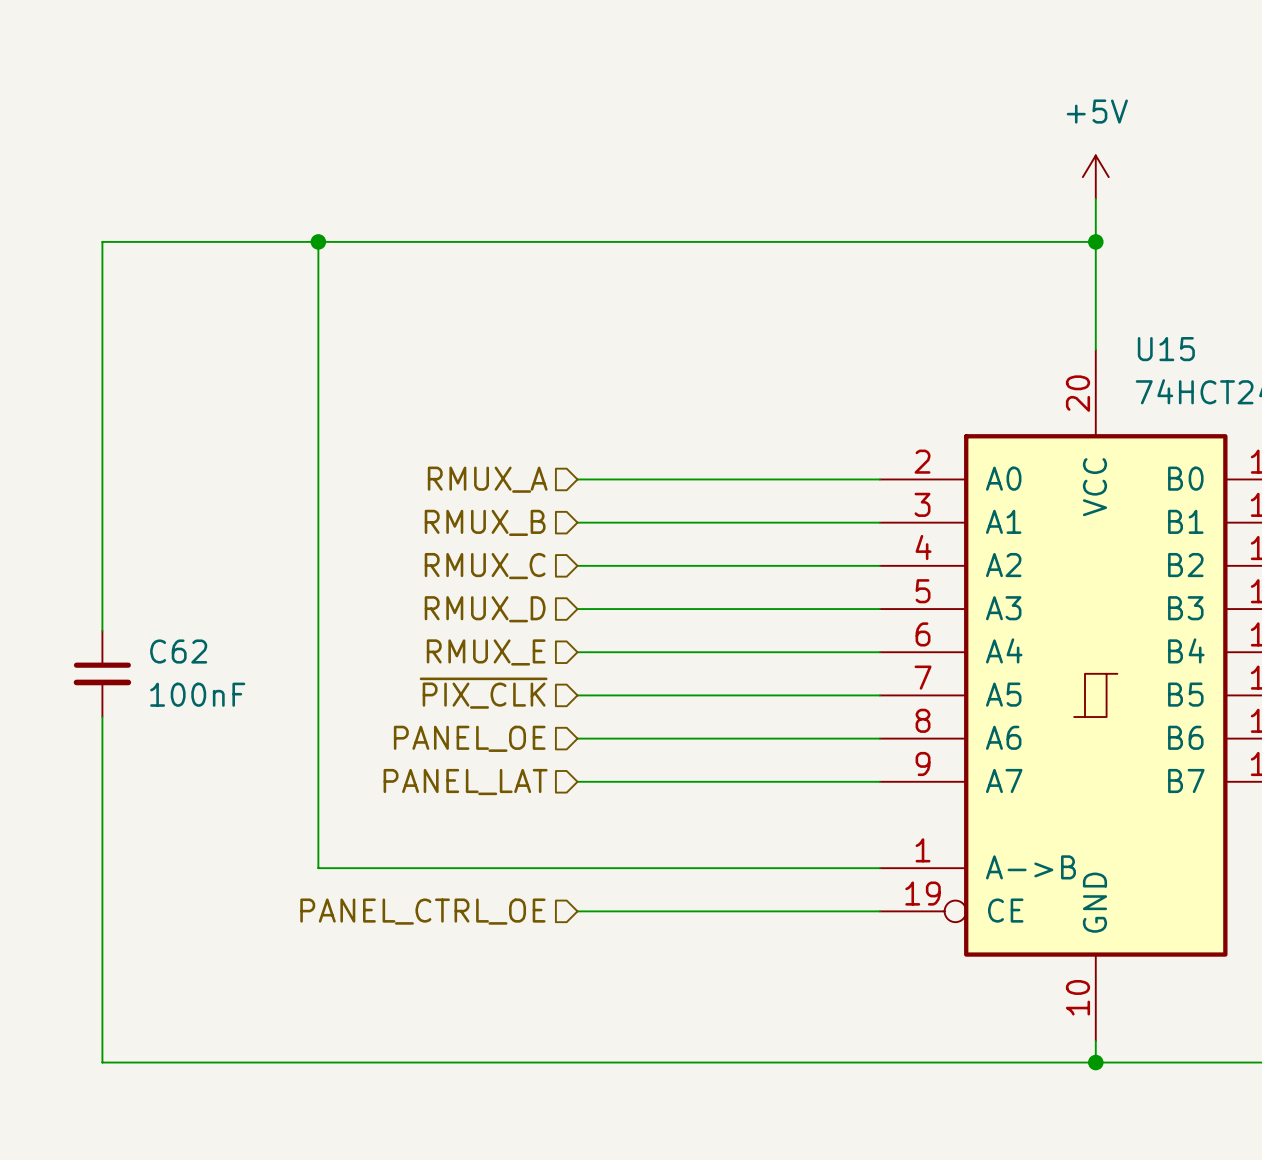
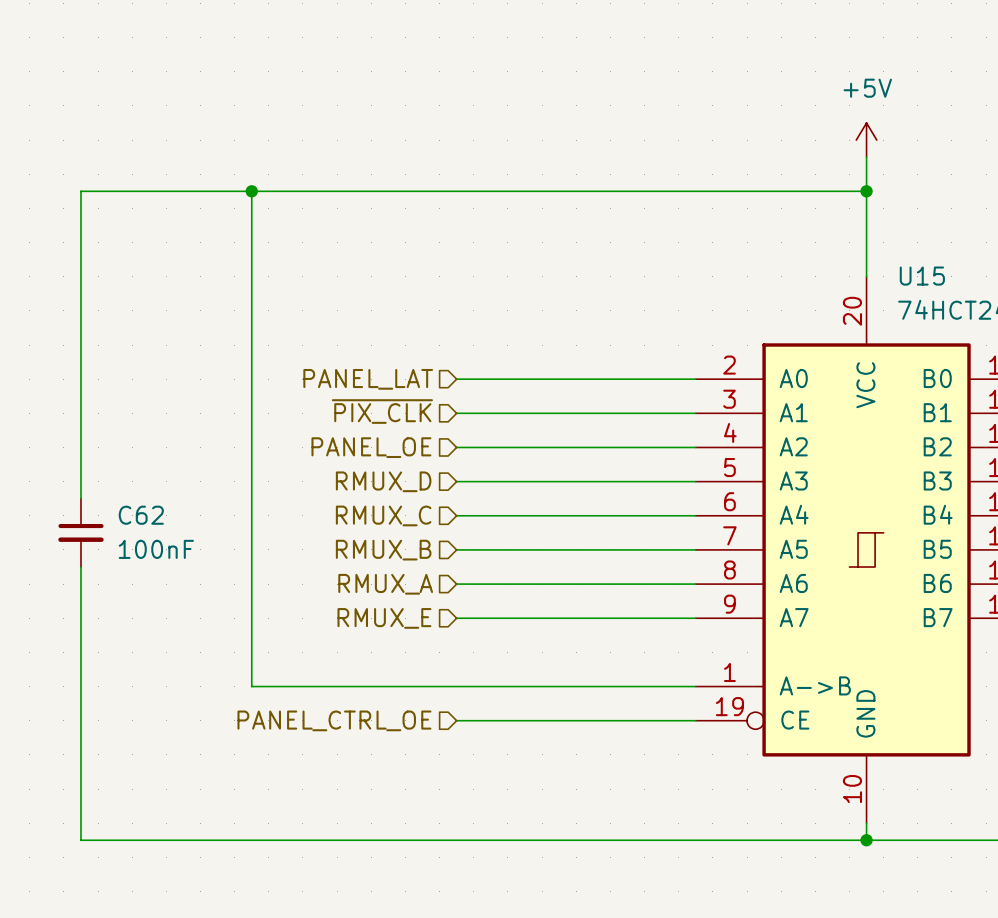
hierarchical label: RMUX_A (487, 479) -> PANEL_LAT (368, 379)
hierarchical label: RMUX_B (485, 522) -> ~{PIX_CLK} (382, 411)
hierarchical label: RMUX_C (485, 566) -> PANEL_OE (371, 447)
hierarchical label: RMUX_E (486, 652) -> RMUX_C (383, 515)
hierarchical label: ~{PIX_CLK} (483, 693) -> RMUX_B (383, 550)
hierarchical label: PANEL_OE (469, 738) -> RMUX_A (385, 584)
hierarchical label: PANEL_LAT (465, 782) -> RMUX_E (384, 618)

